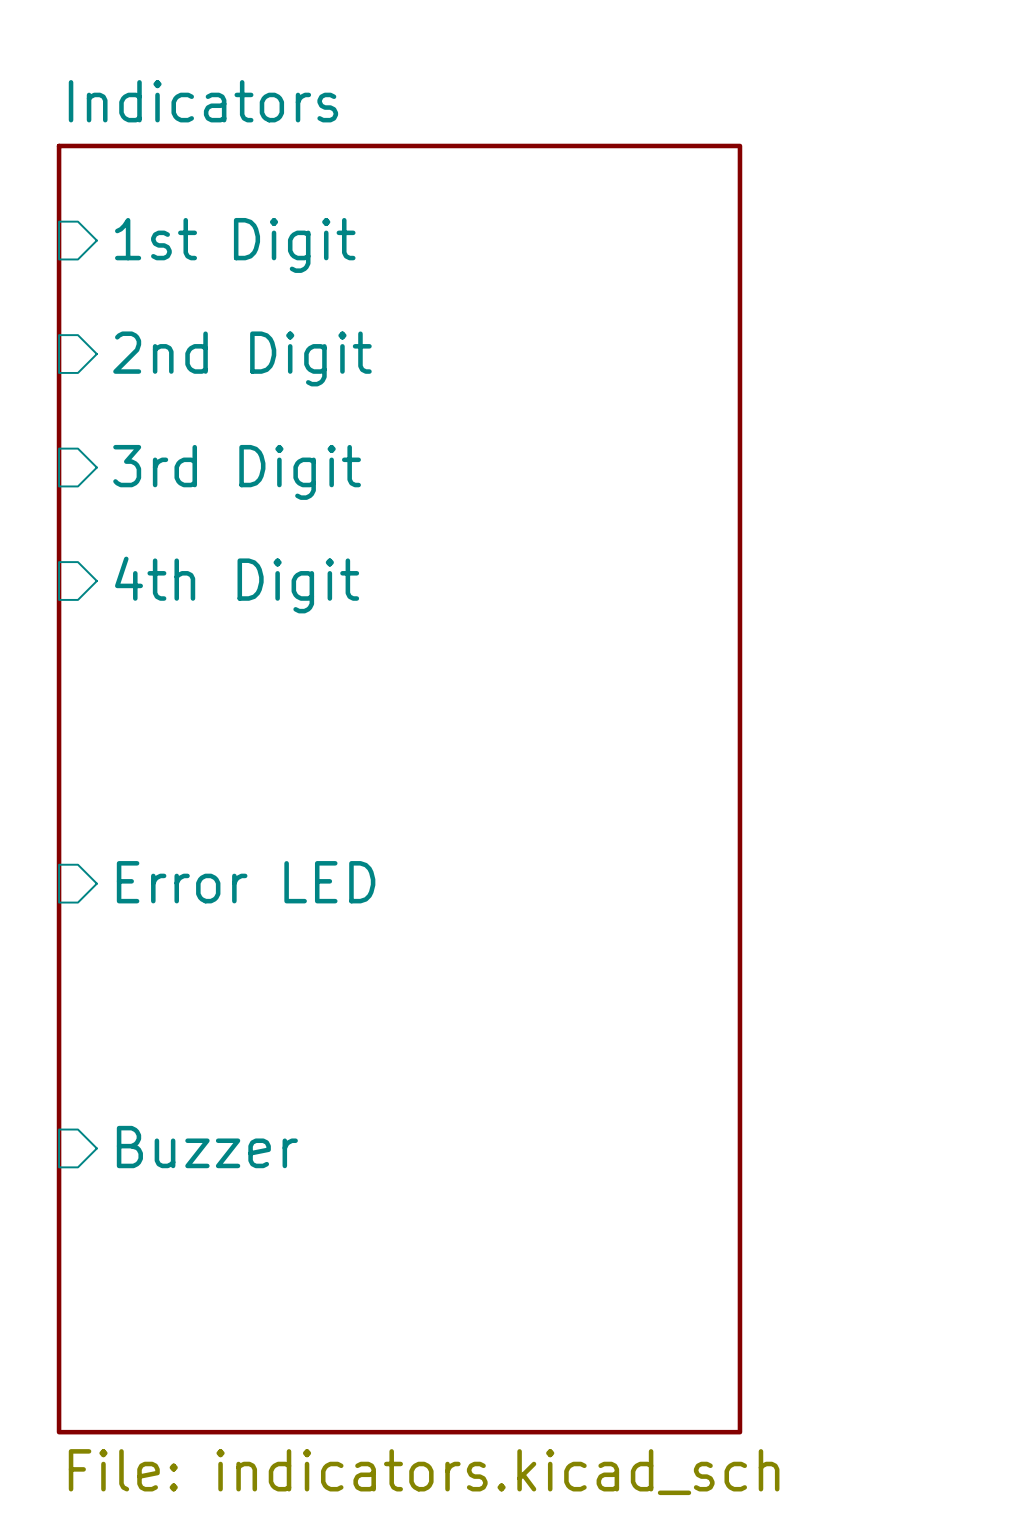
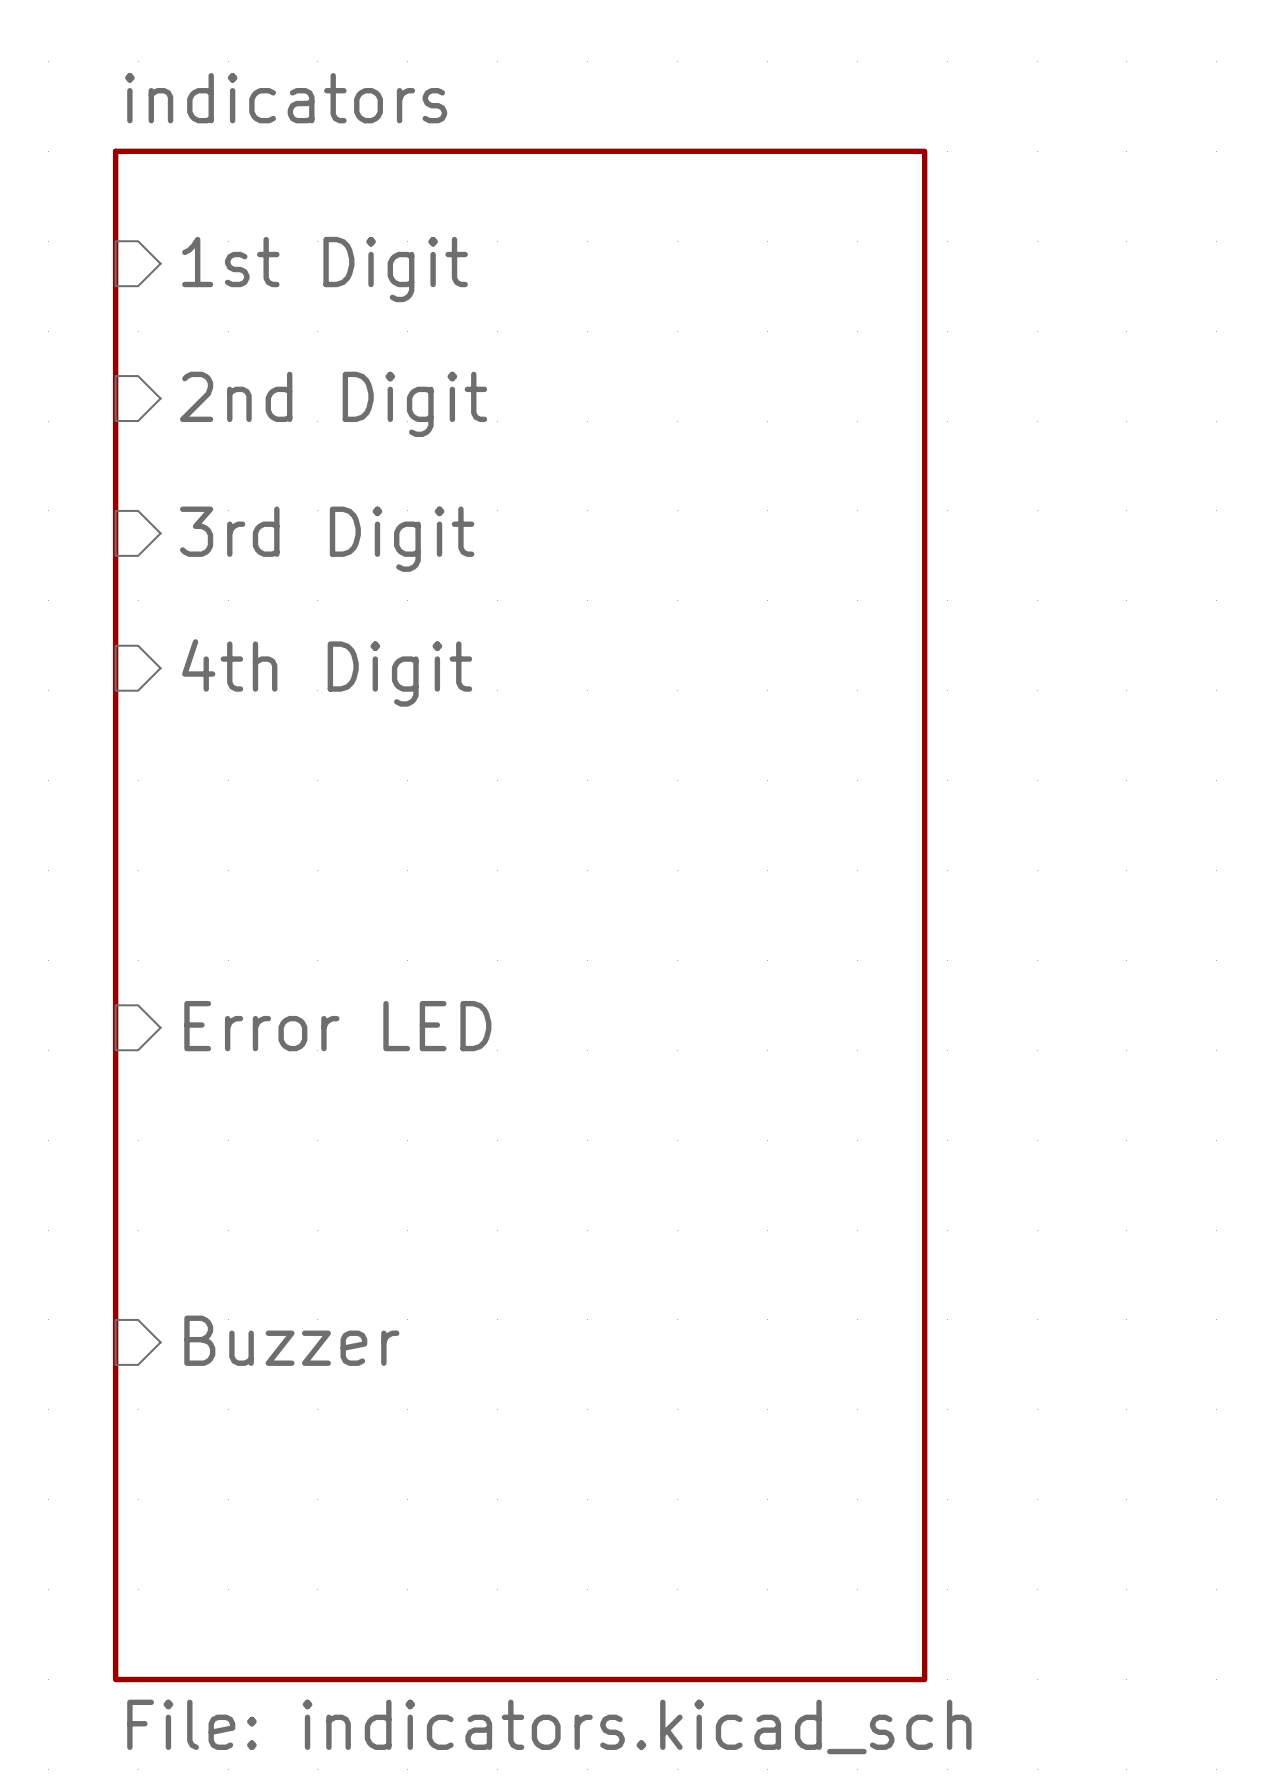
sheet Indicators name: Indicators (203, 101) -> indicators (286, 98)

